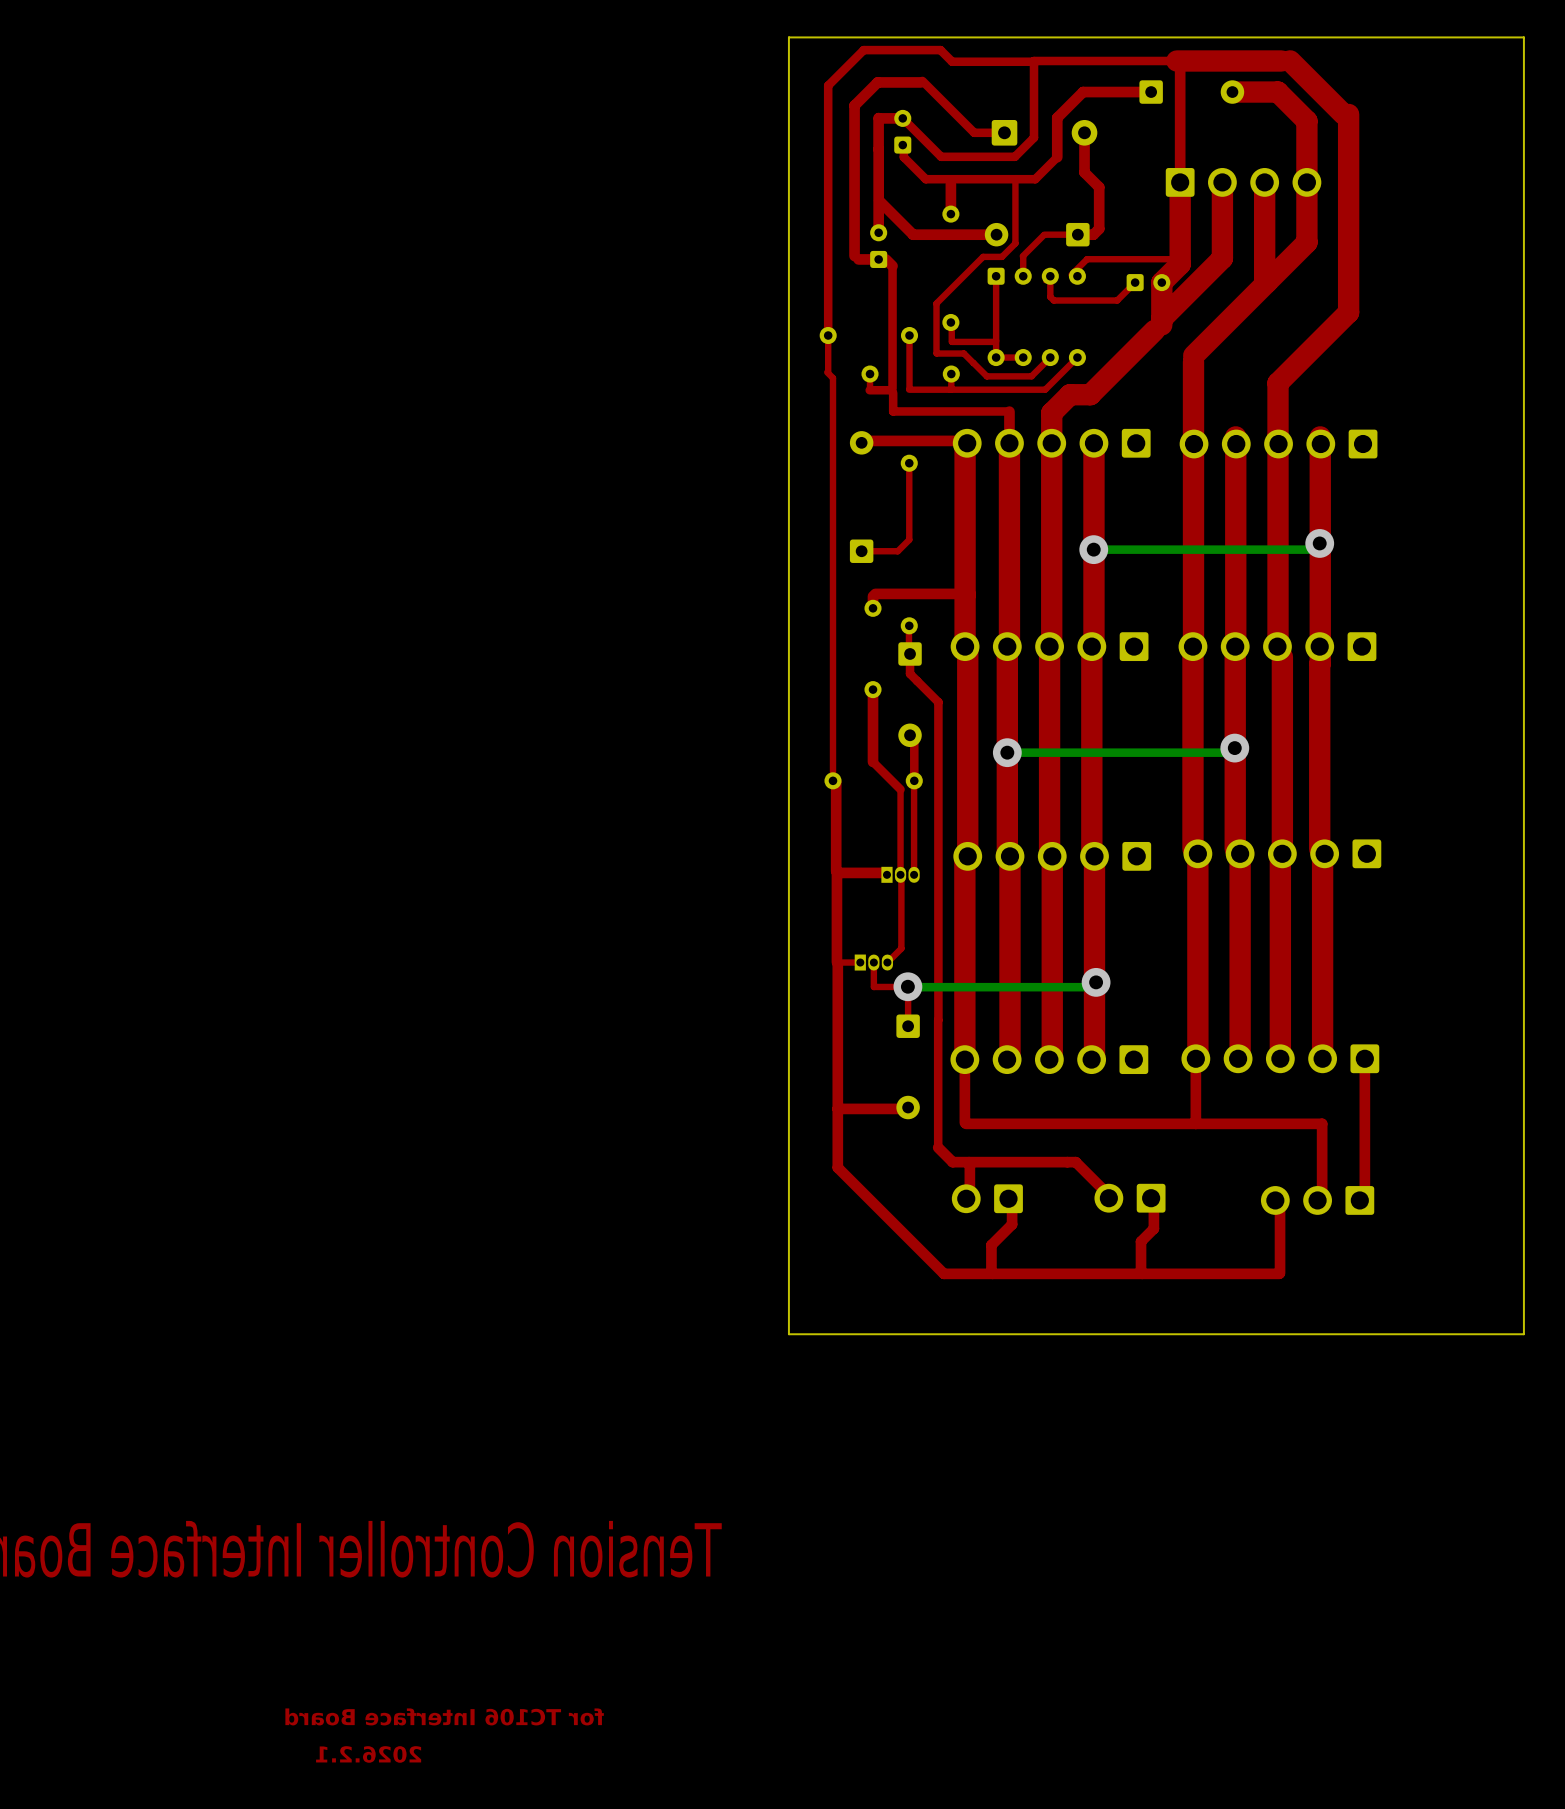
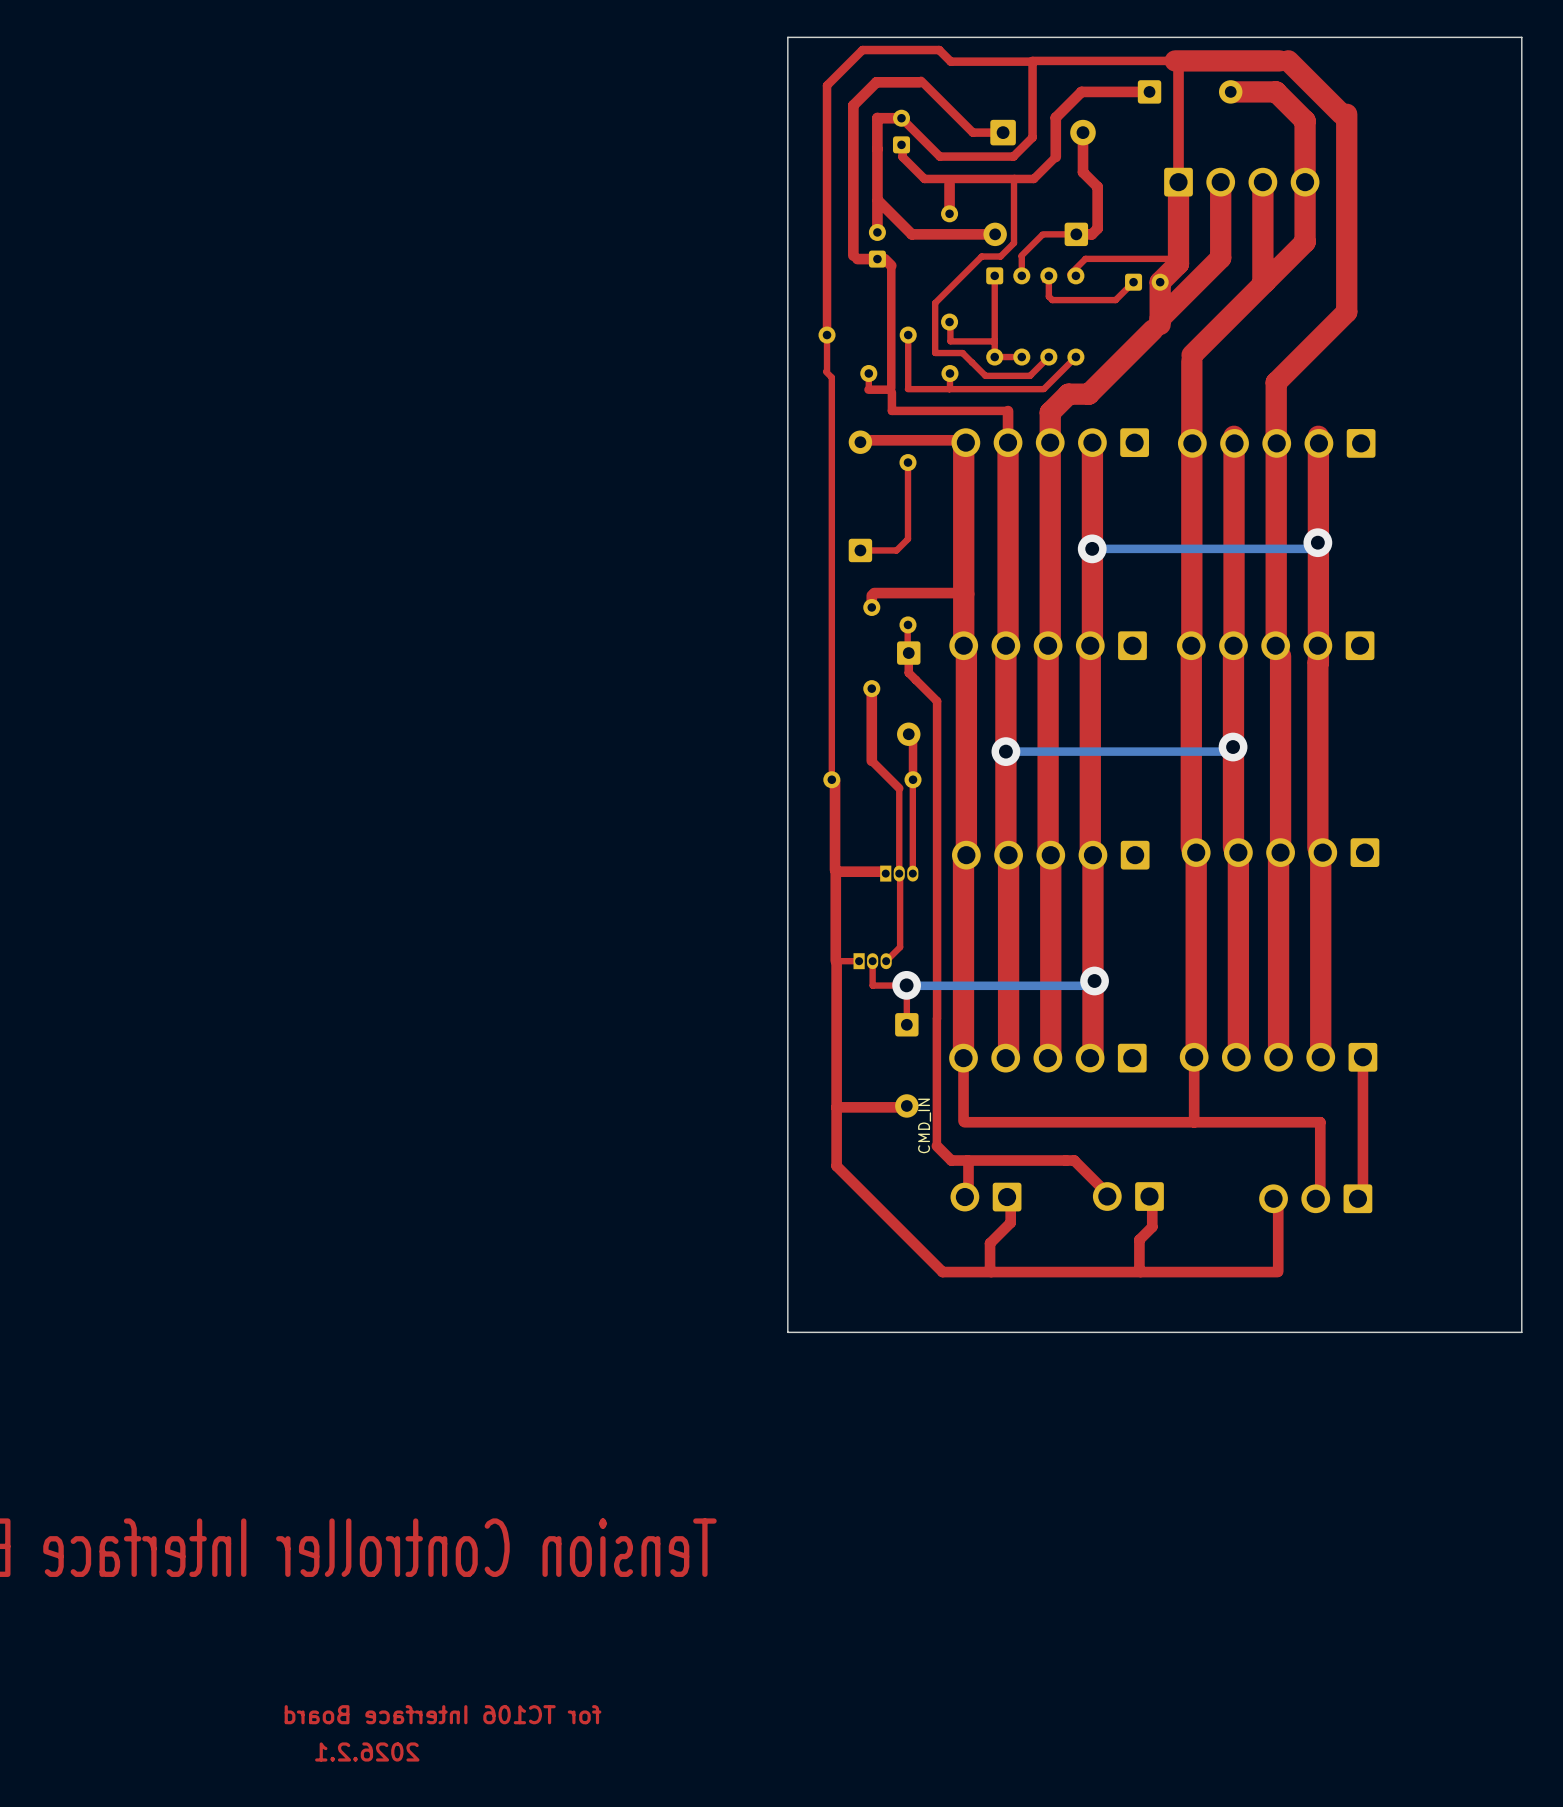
text: none -> CMD_IN (924, 1125)

